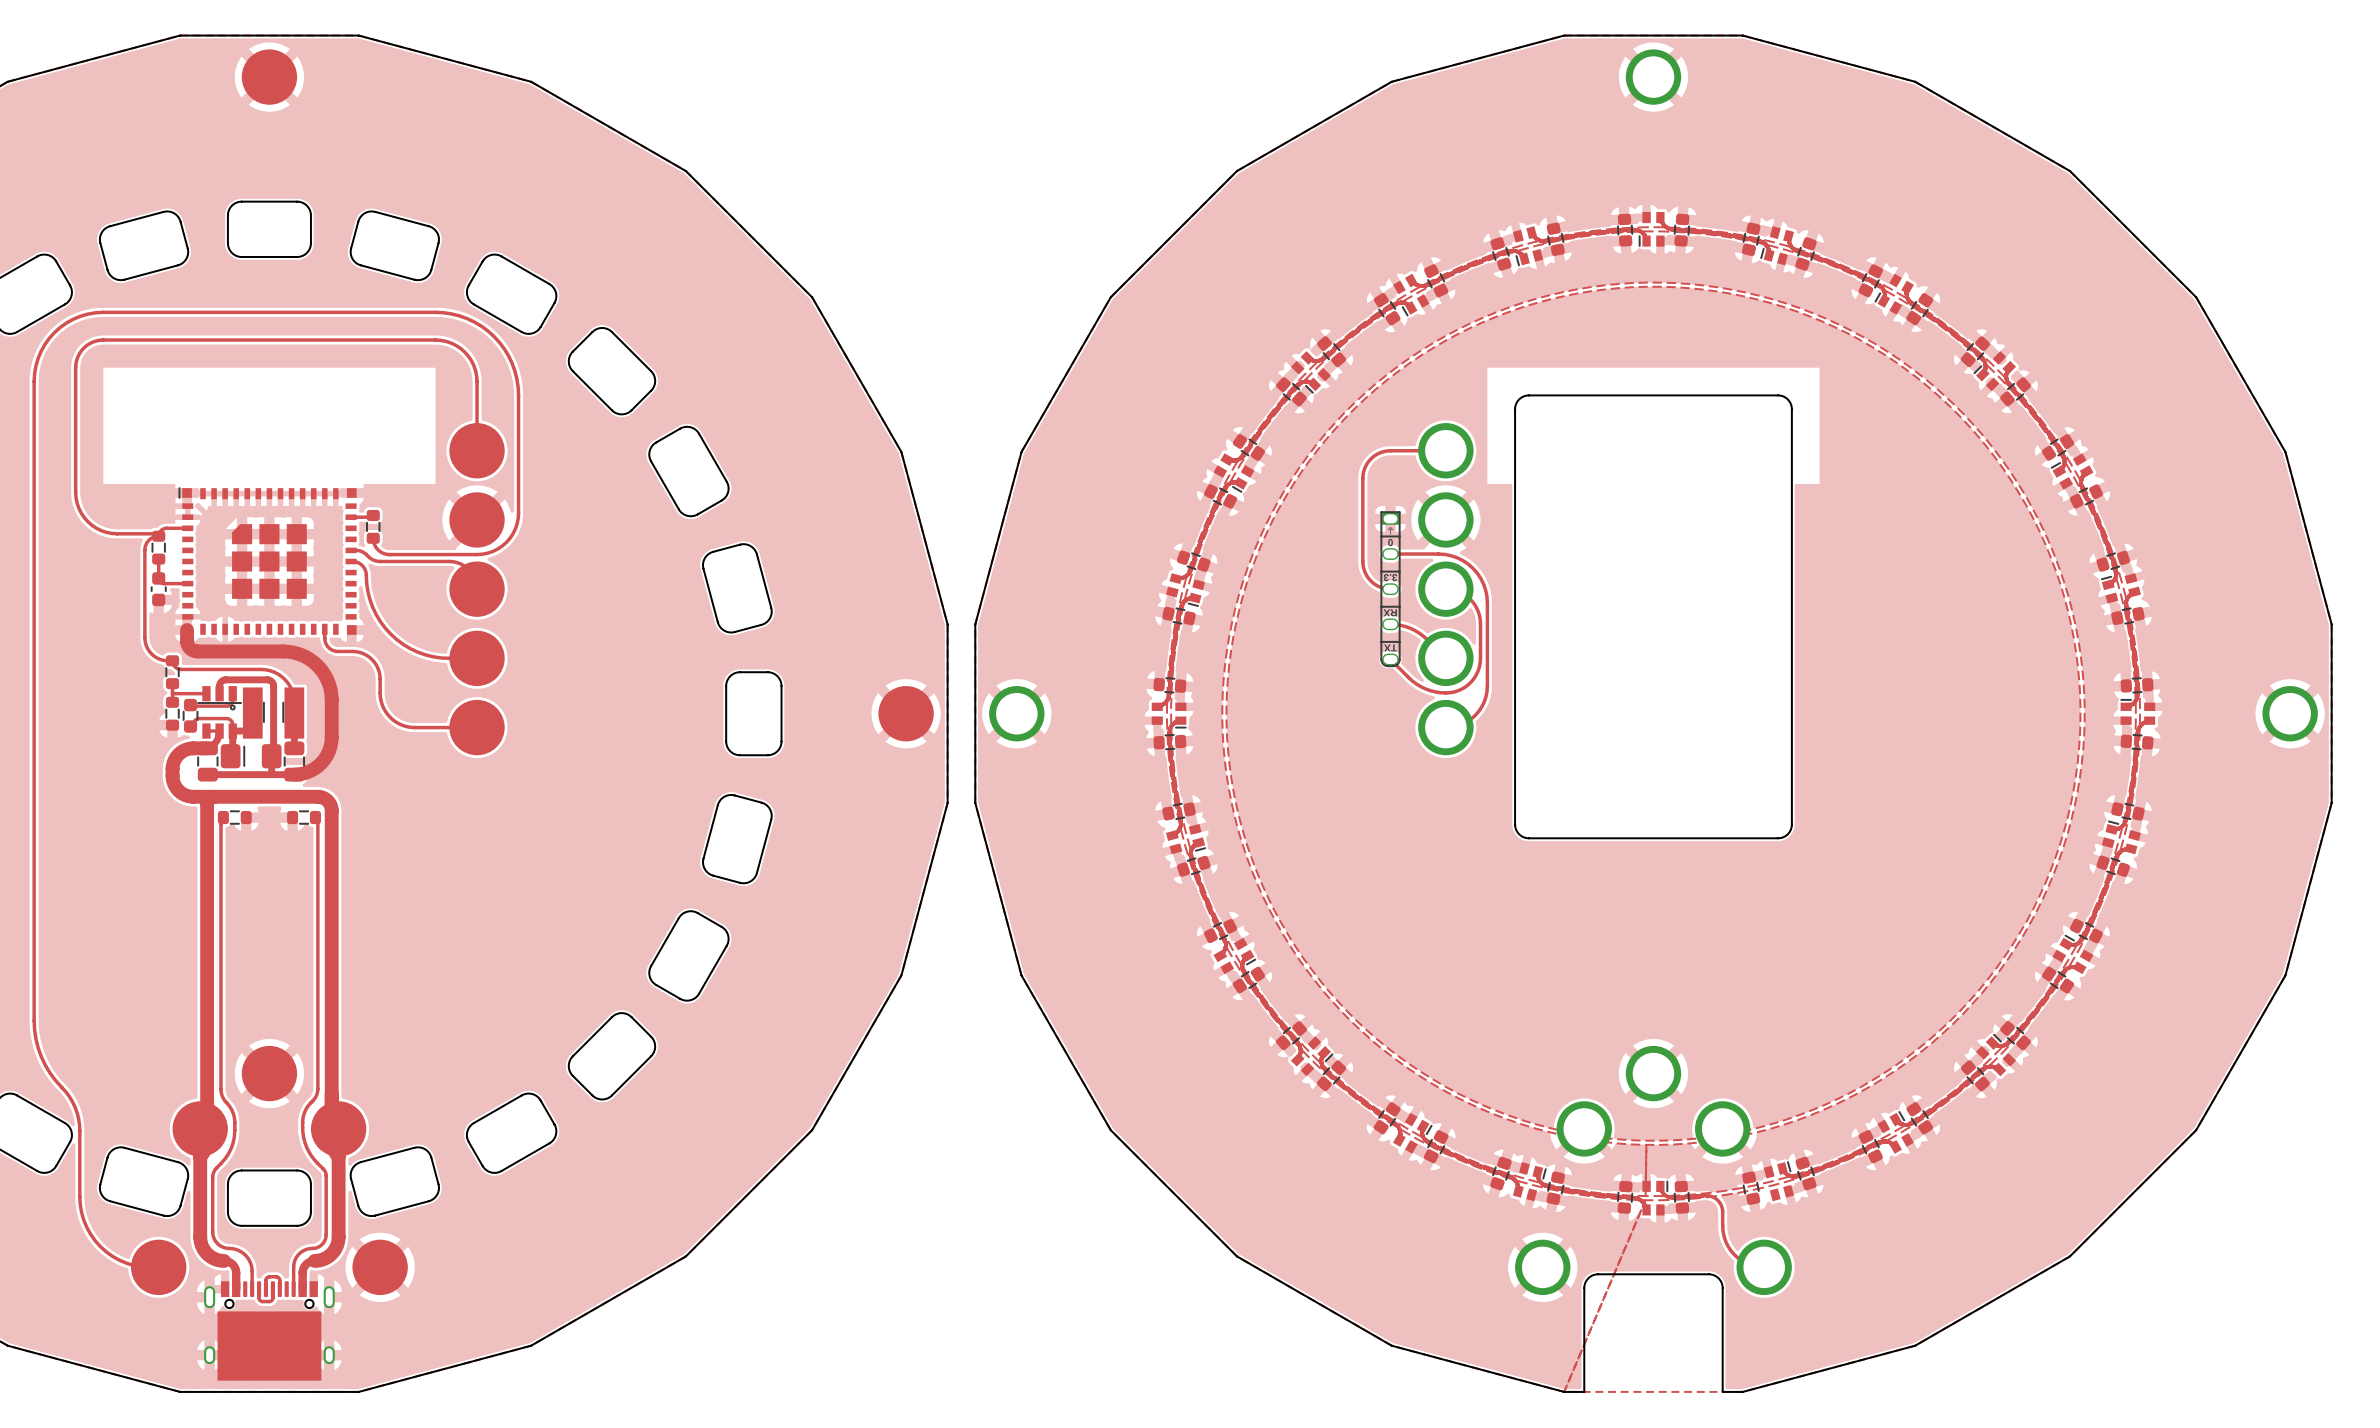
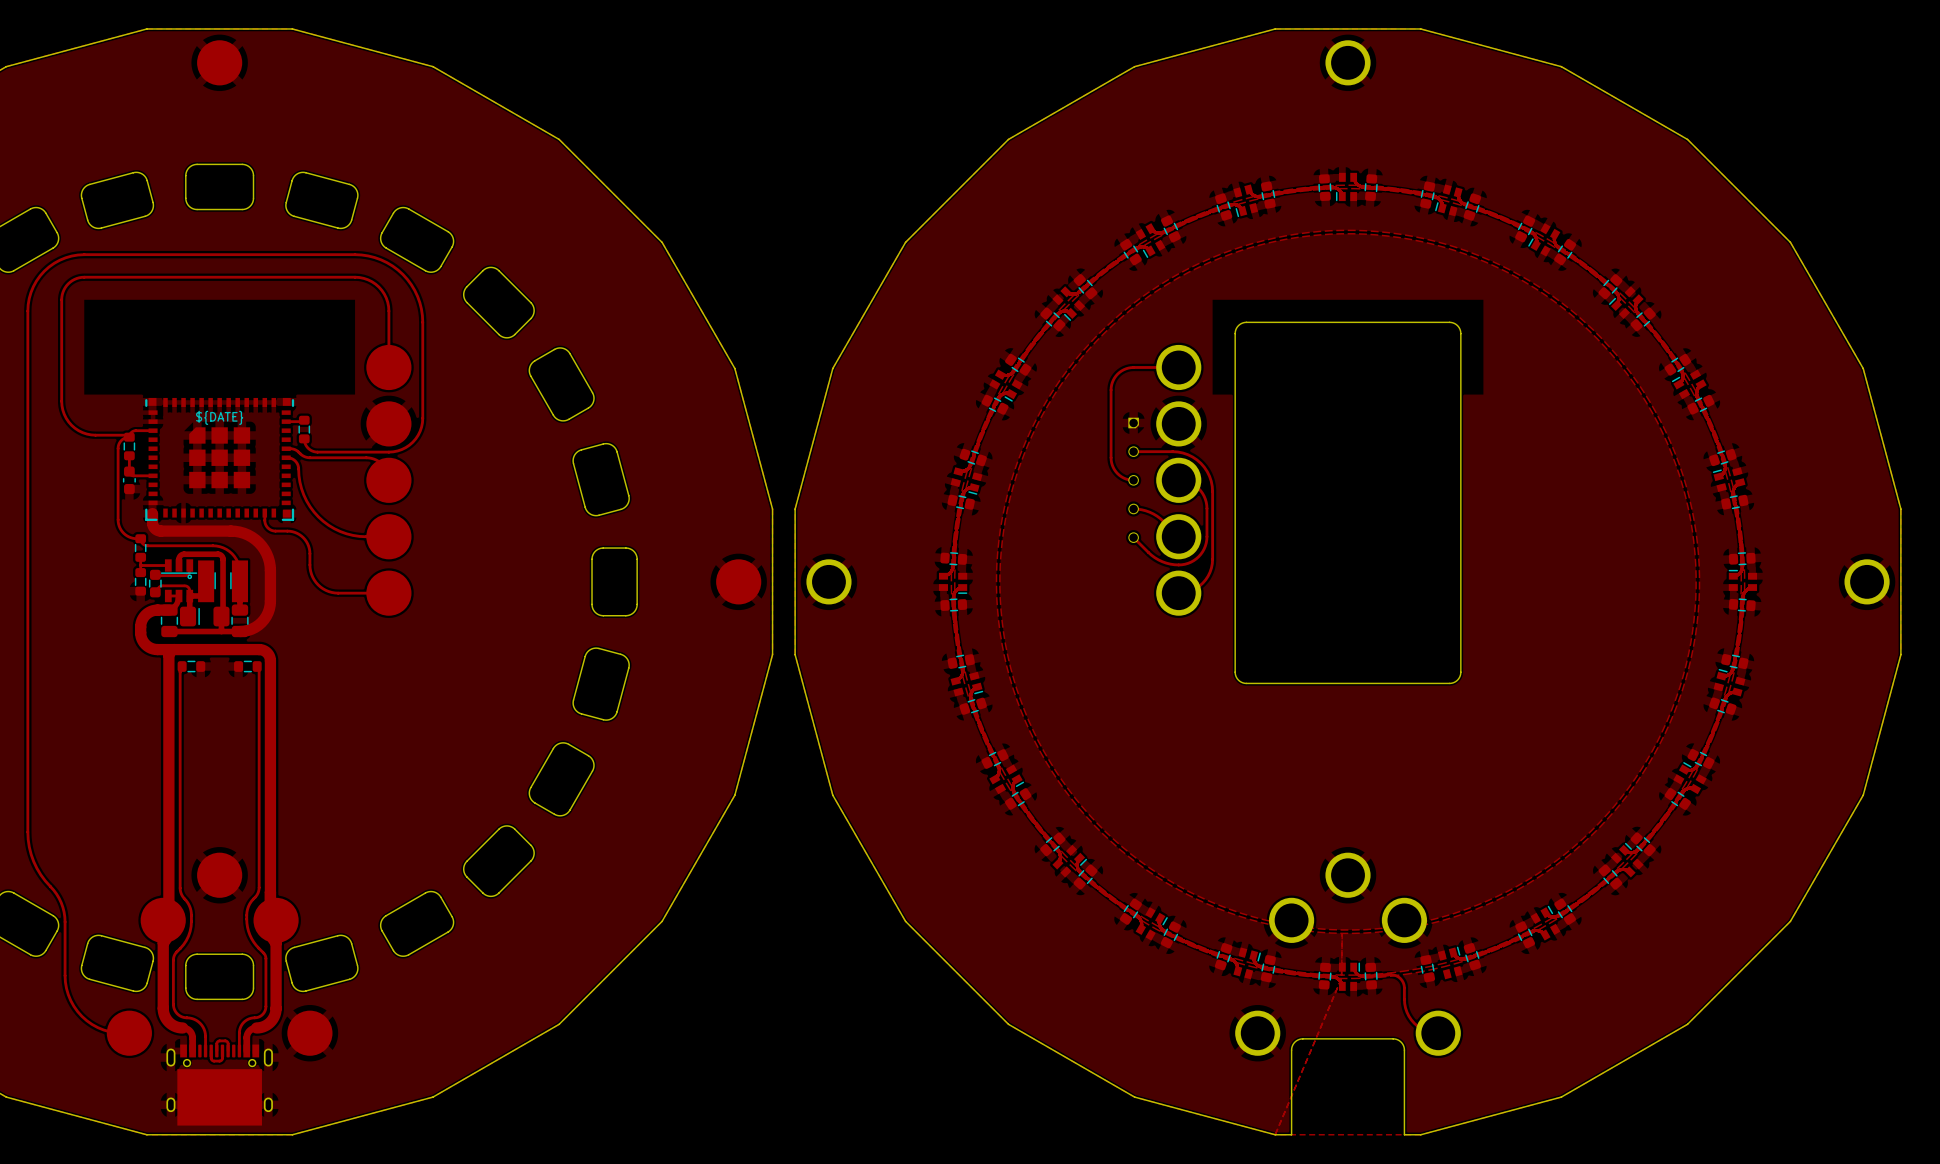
part footprint: [178, 487, 357, 635] -> [145, 397, 295, 521]
part footprint: [1380, 511, 1401, 667] -> [1128, 417, 1139, 543]

